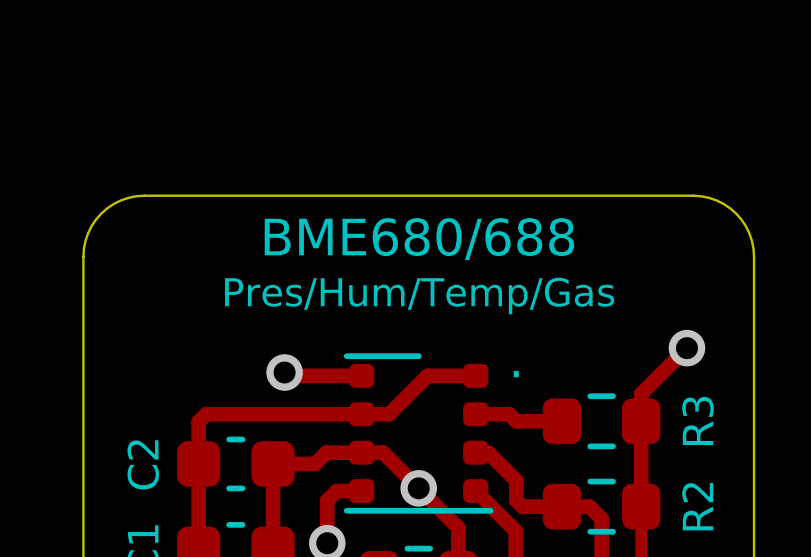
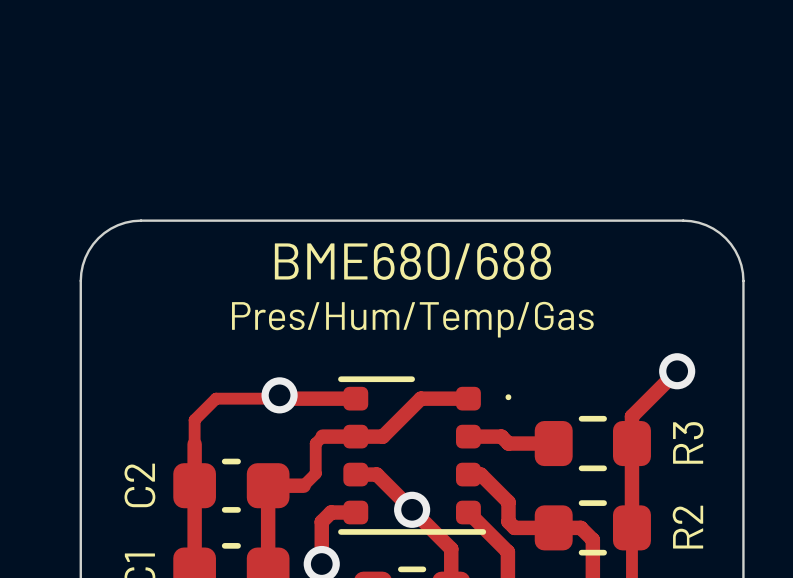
track: (328, 414) (206, 414) (198, 421) -> (282, 398) (216, 398) (194, 420) (194, 444)
track: (361, 452) (326, 452) (315, 463) (308, 463) -> (322, 436) (315, 443) (315, 473) (303, 485)

